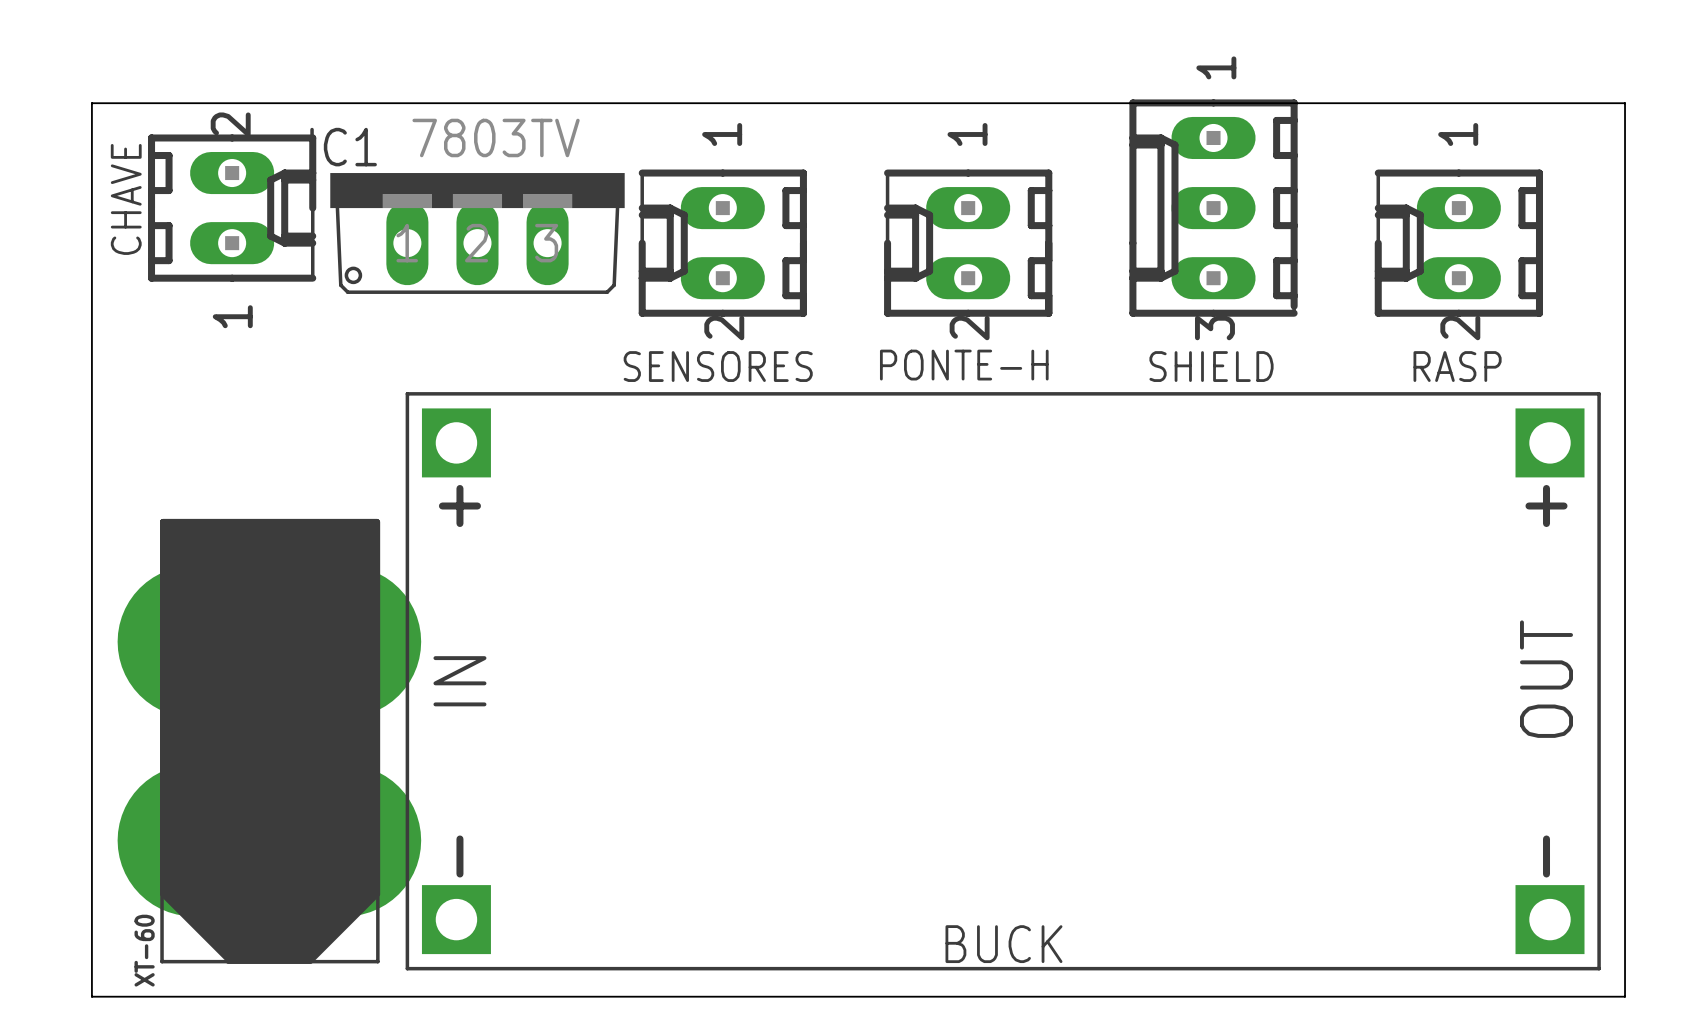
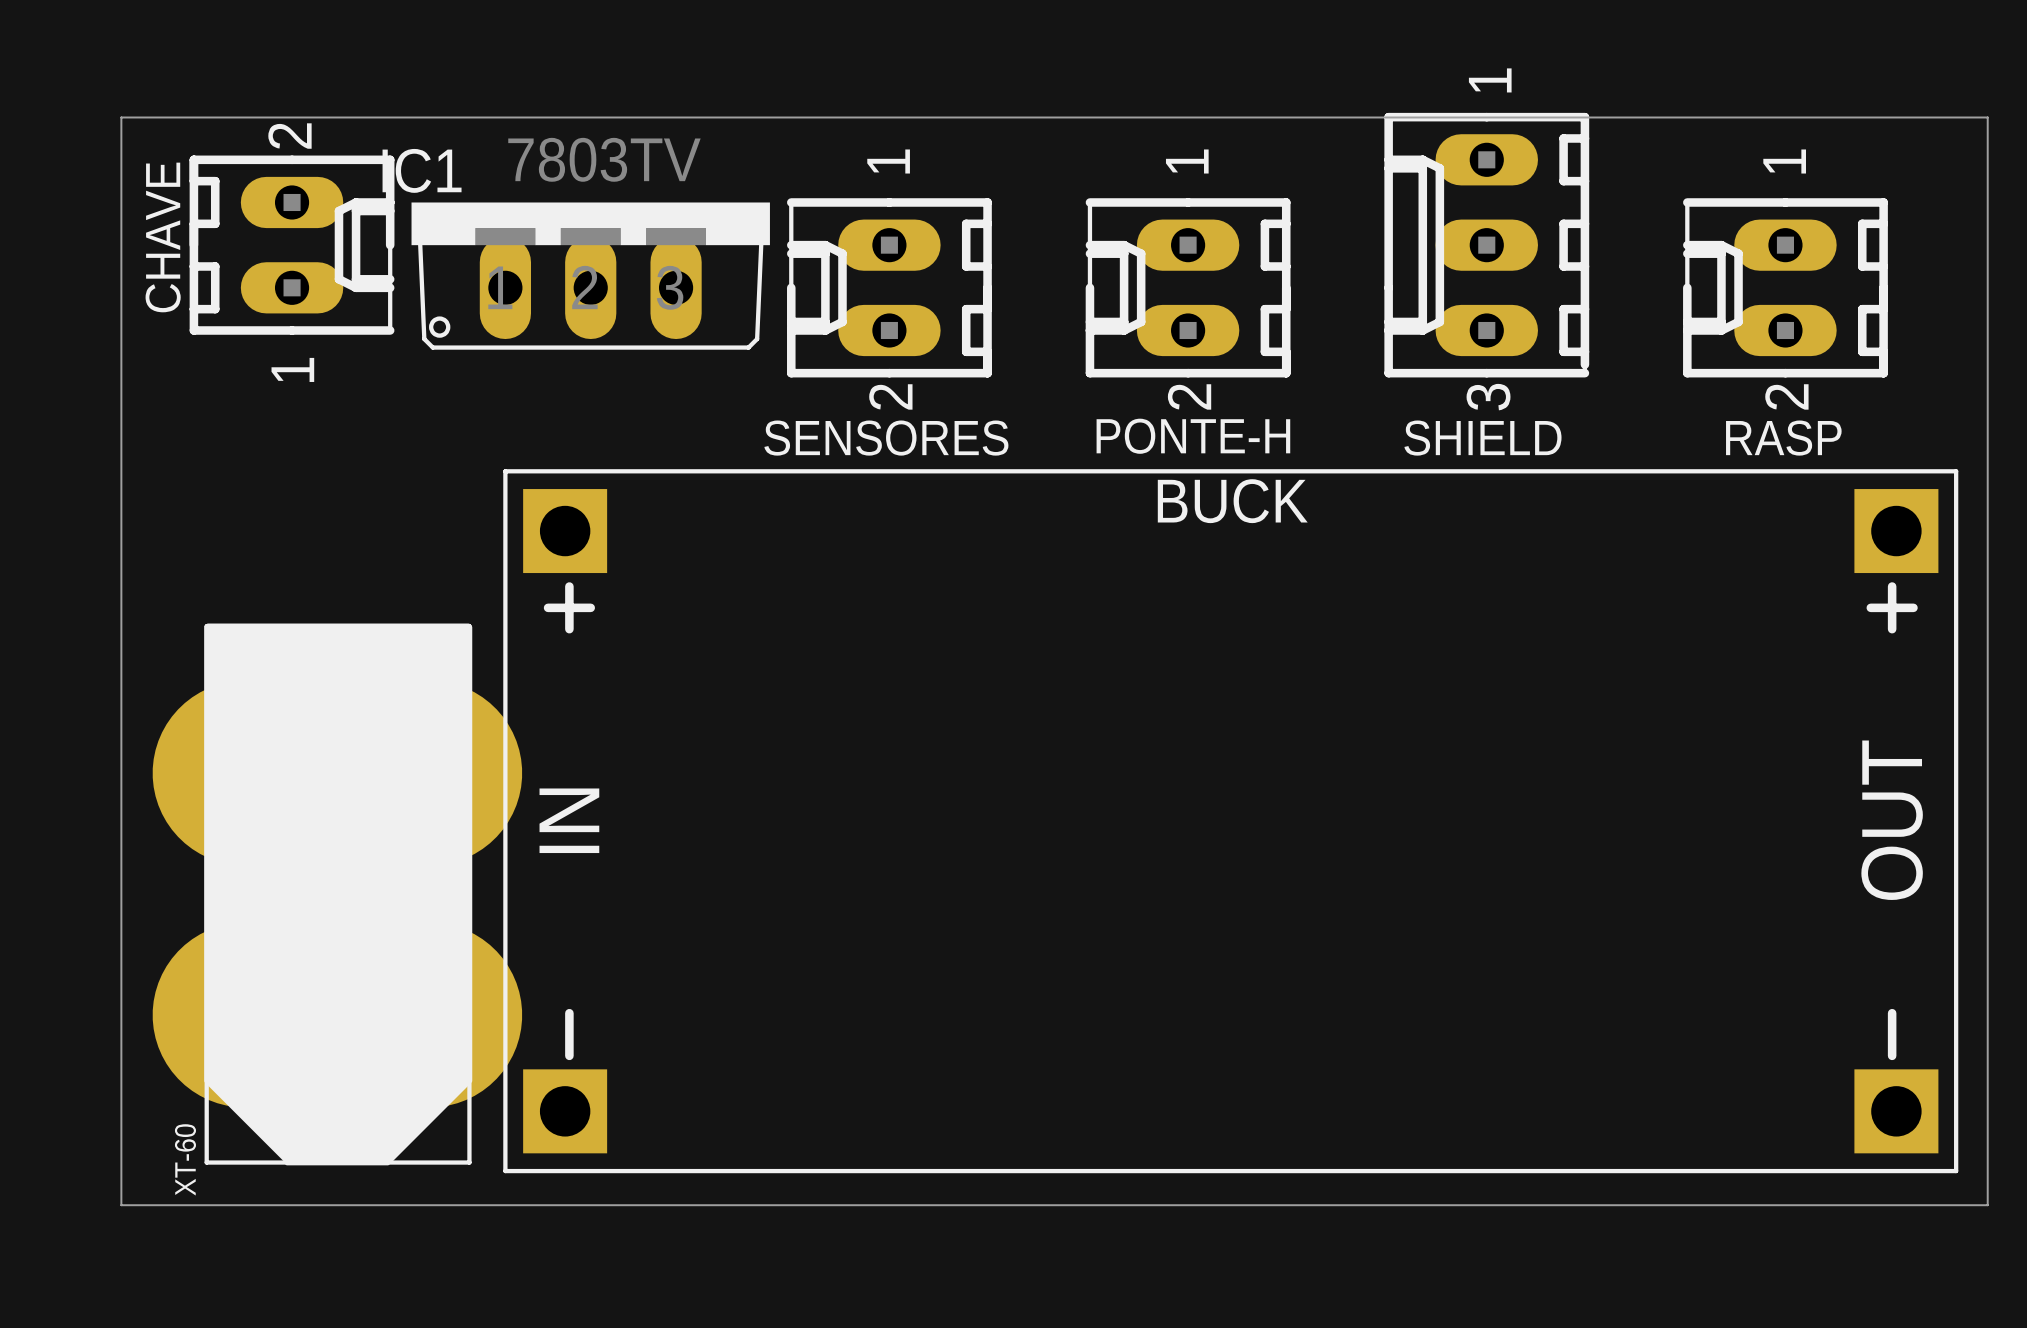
BUCK name position: BUCK (1003, 944) -> BUCK (1232, 501)

